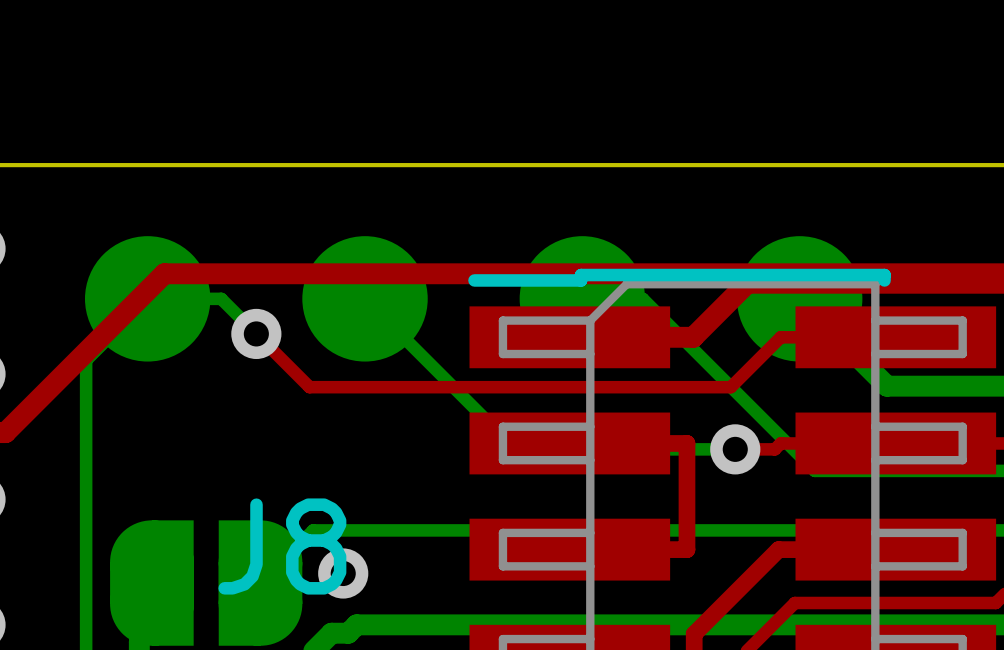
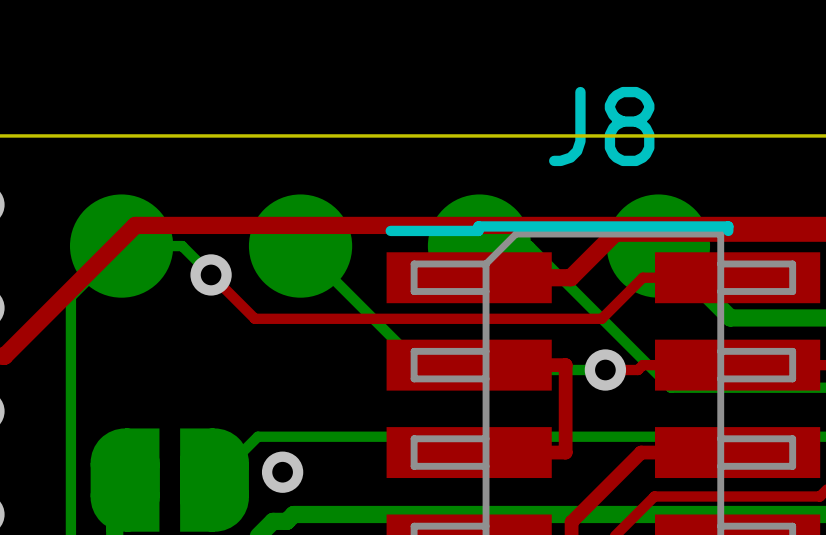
J8 name position: J8 (282, 546) -> J8 (601, 126)

